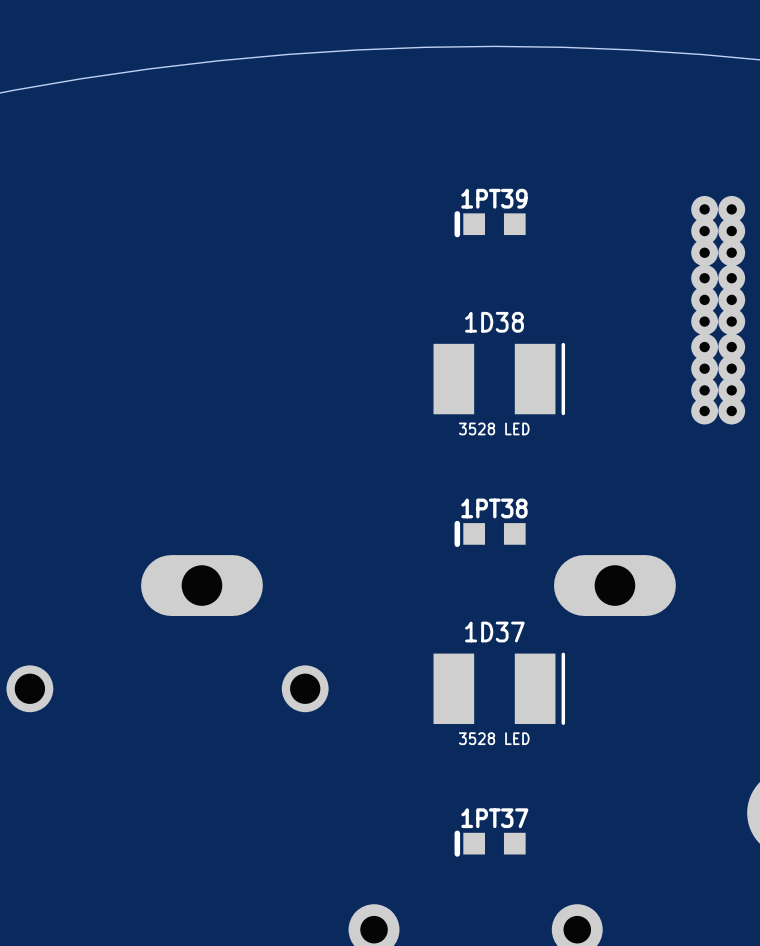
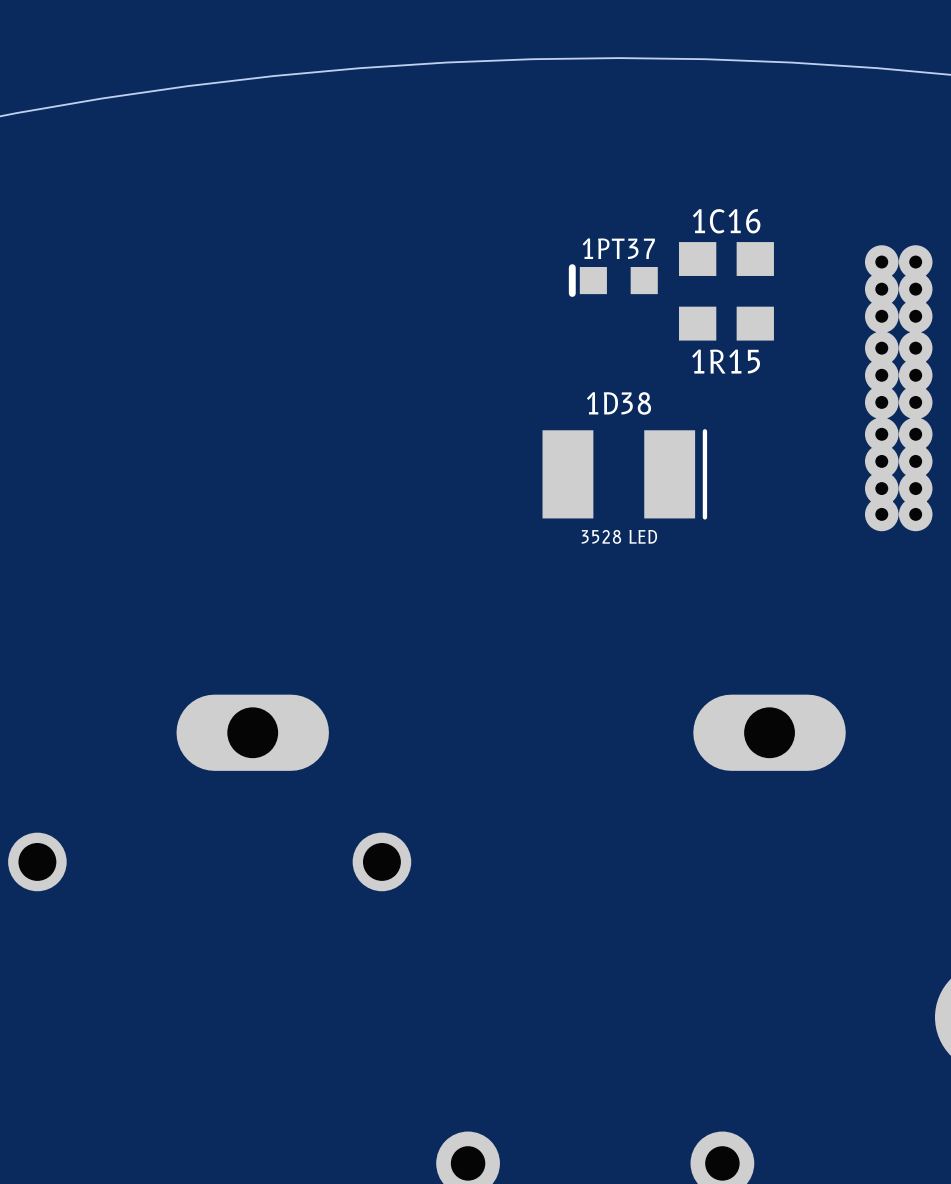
1PT39 name: 1PT39 (494, 198) -> 1PT37 (618, 248)
1C16: none -> (726, 259)
1R15: none -> (726, 323)
1PT38: (490, 533) -> none
1D37: (499, 688) -> none
1PT37: (490, 843) -> none

